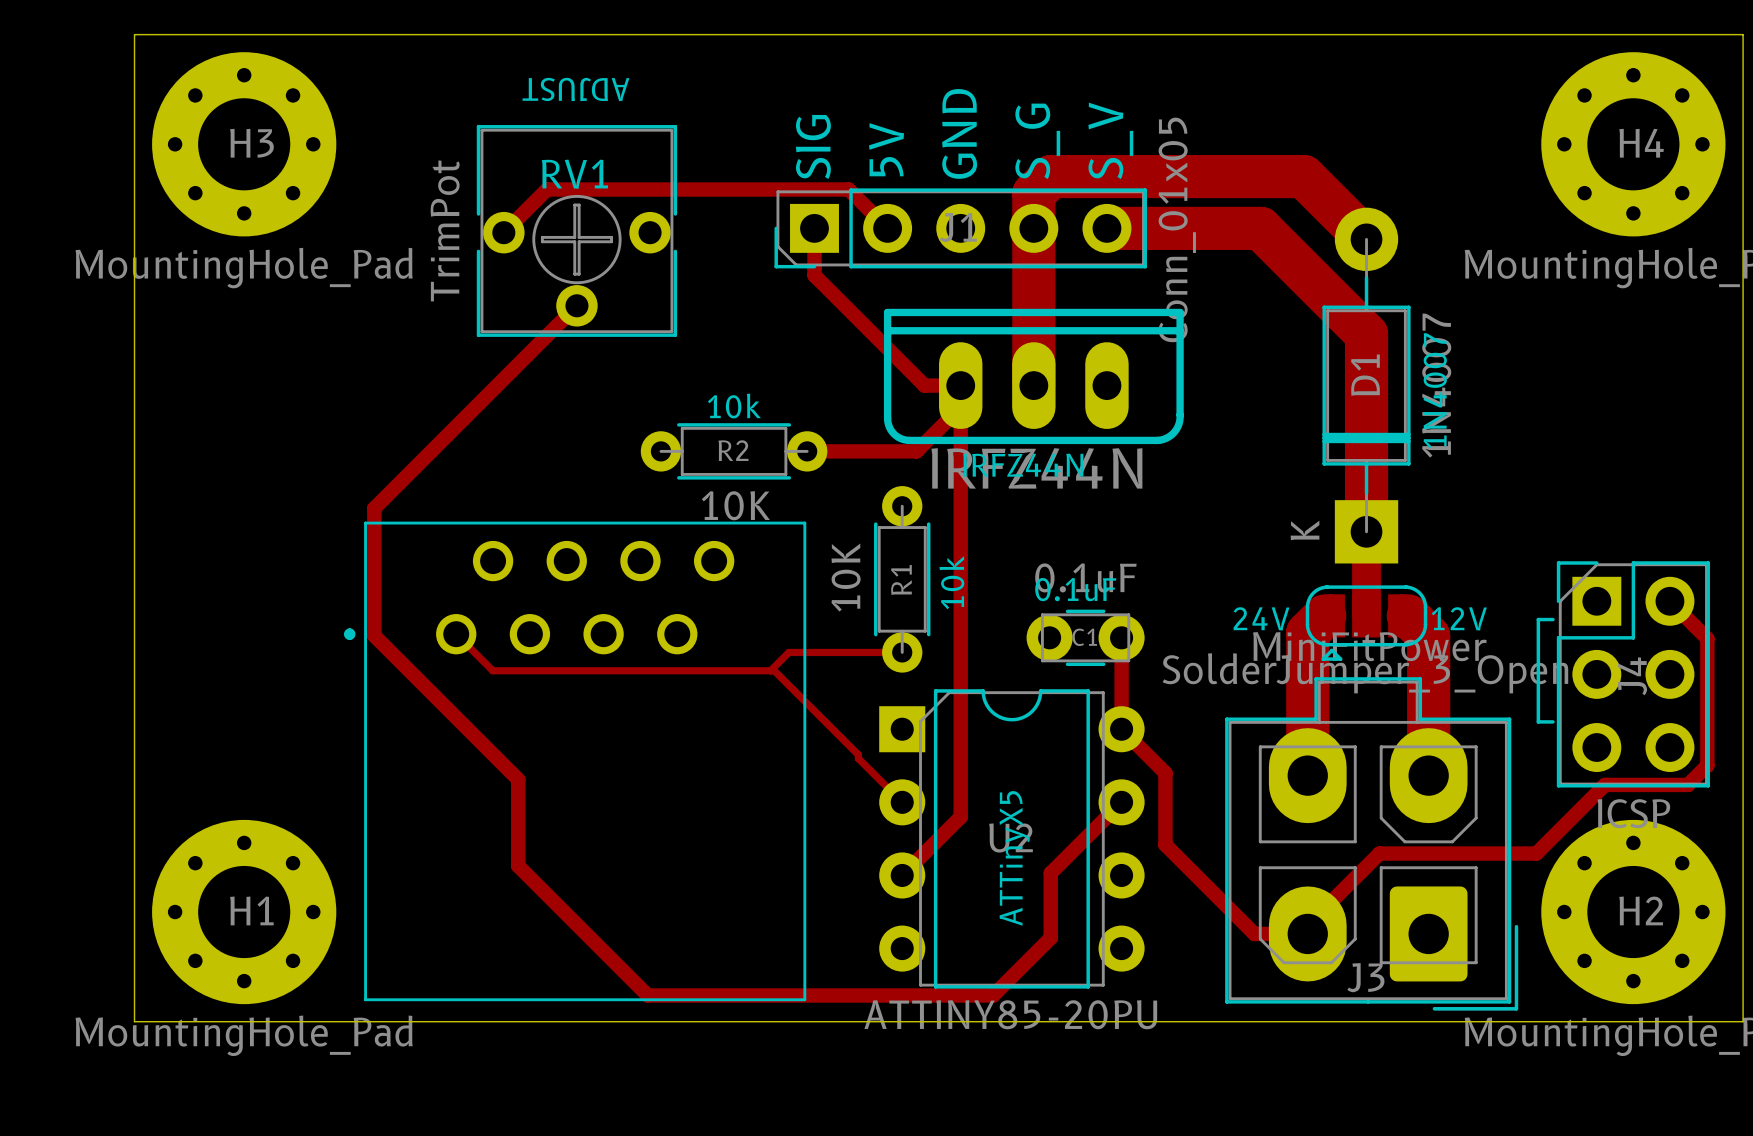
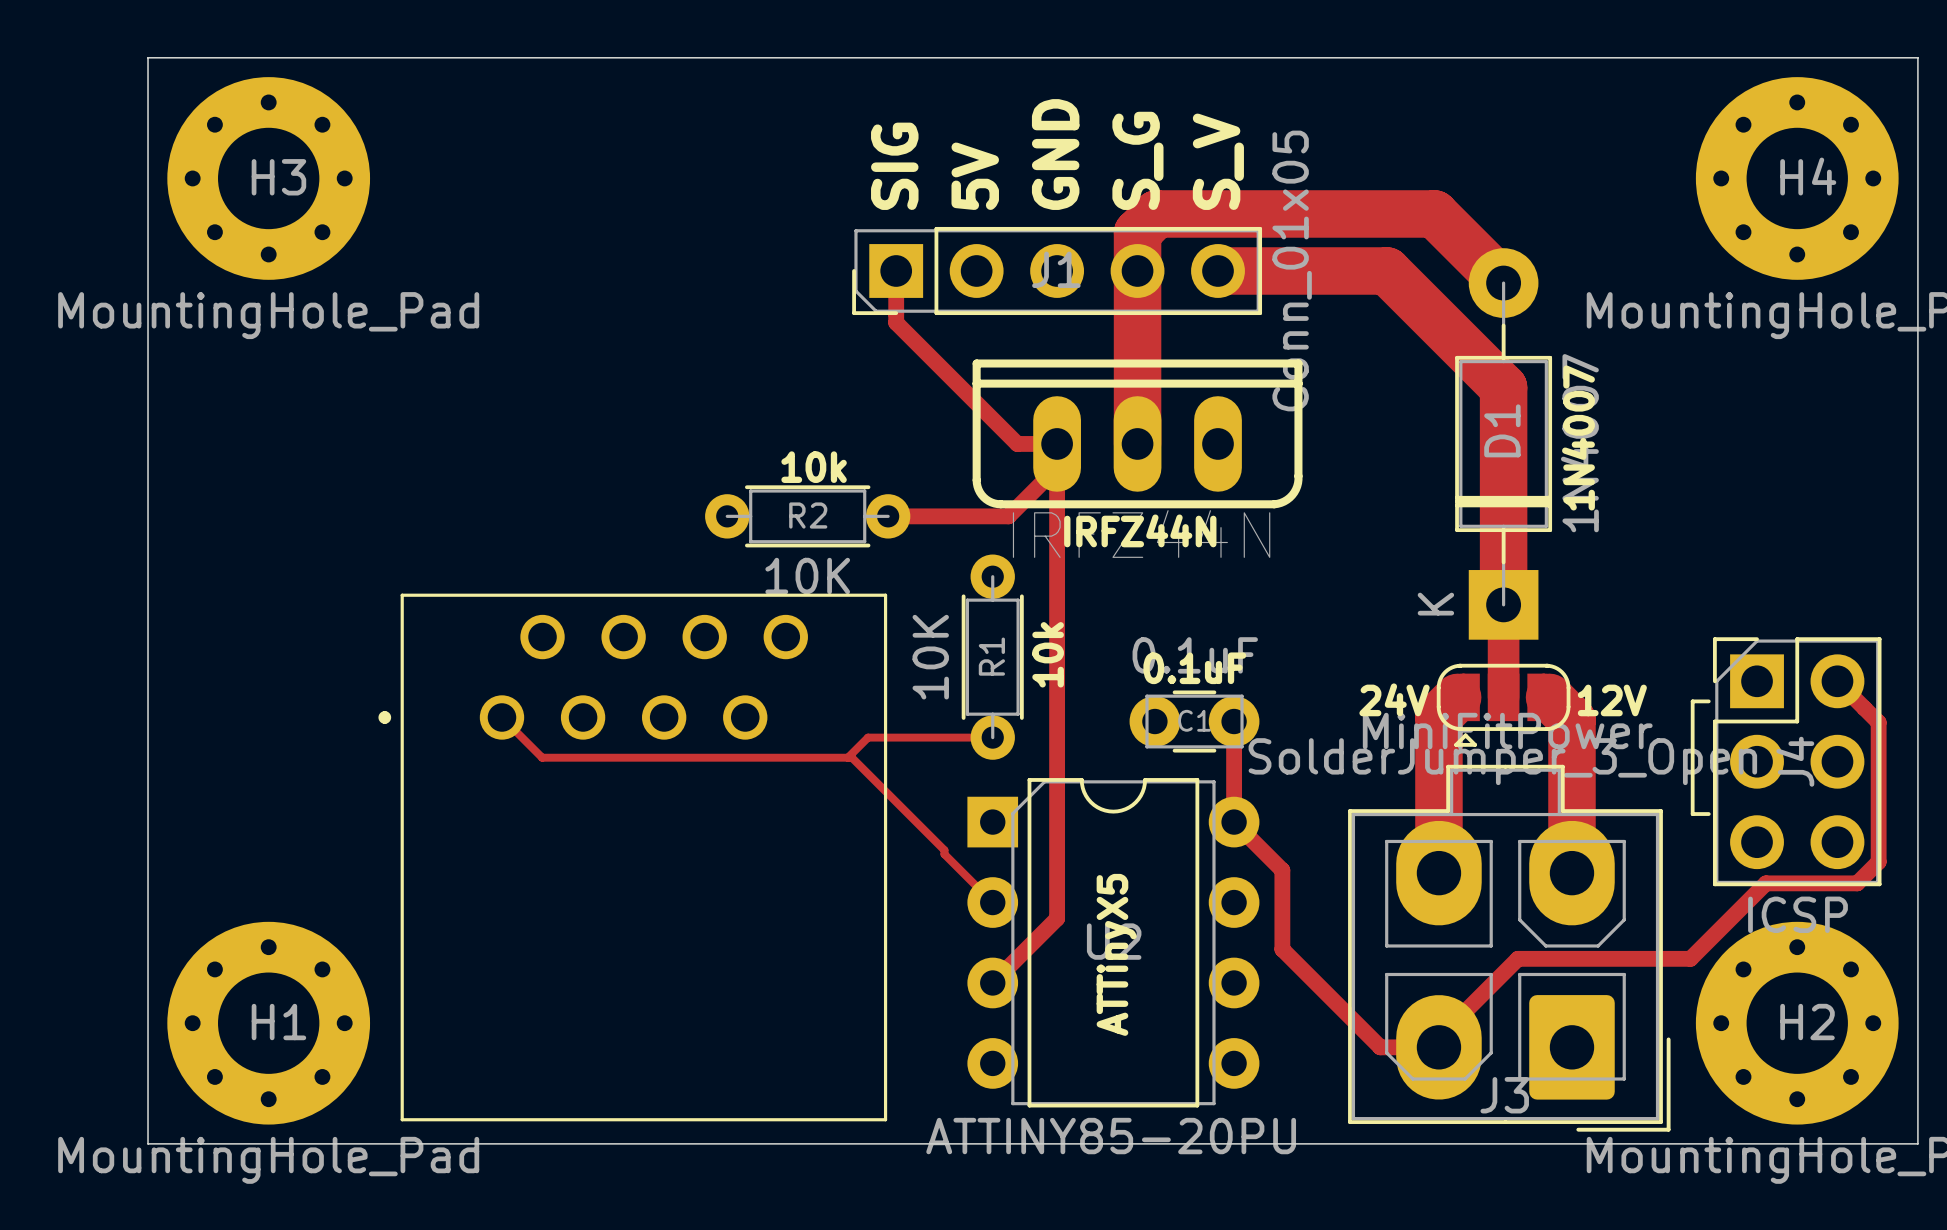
text: ADJUST (575, 89) -> none
track: (887, 228) (848, 189) (547, 189) (503, 232) -> none
RV1: TrimPot (576, 230) -> none
track: (576, 305) (374, 508) (374, 635) (518, 779) (518, 865) (647, 995) (993, 995) (1050, 937) (1050, 873) (1121, 802) -> none

